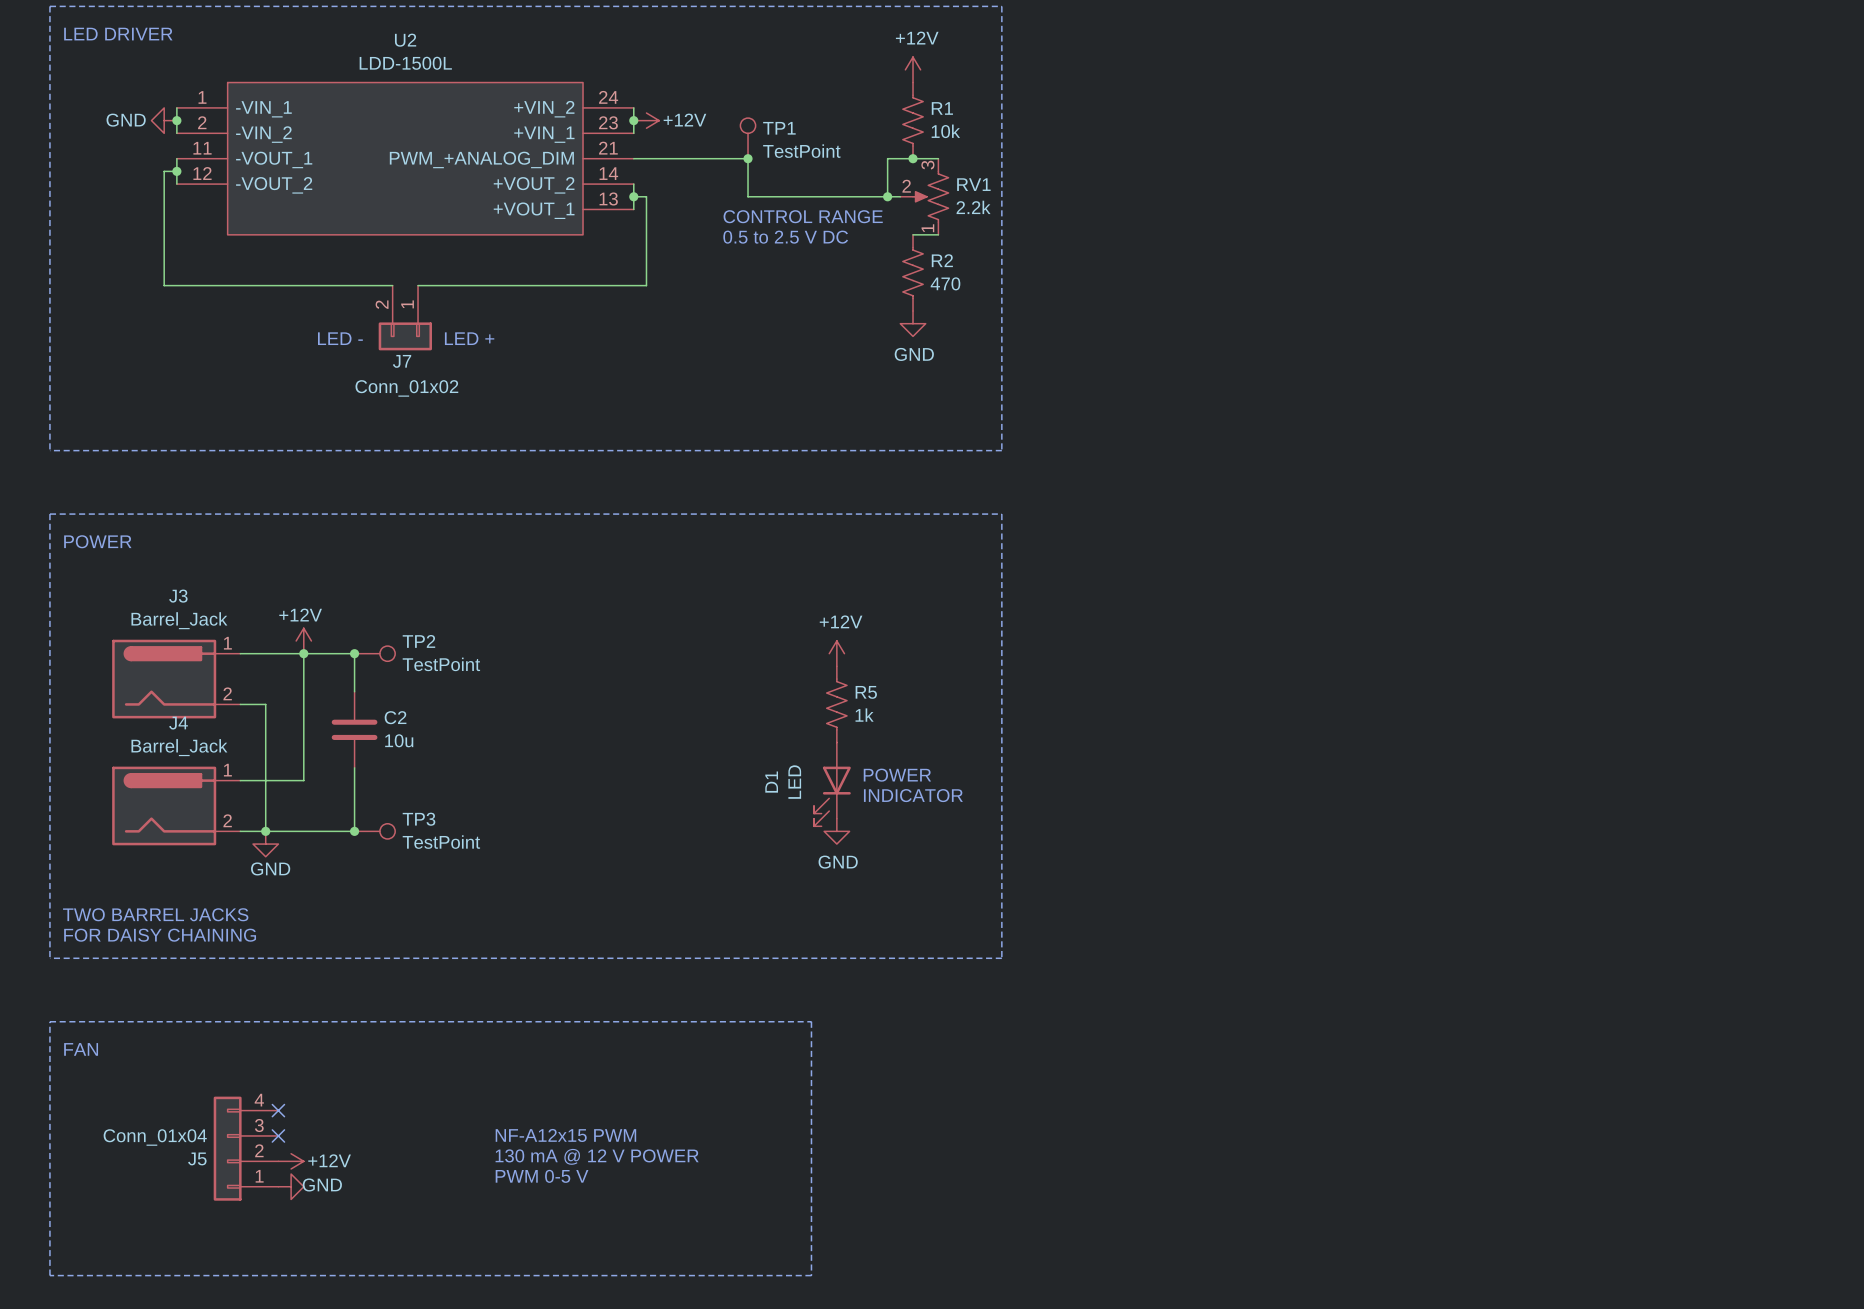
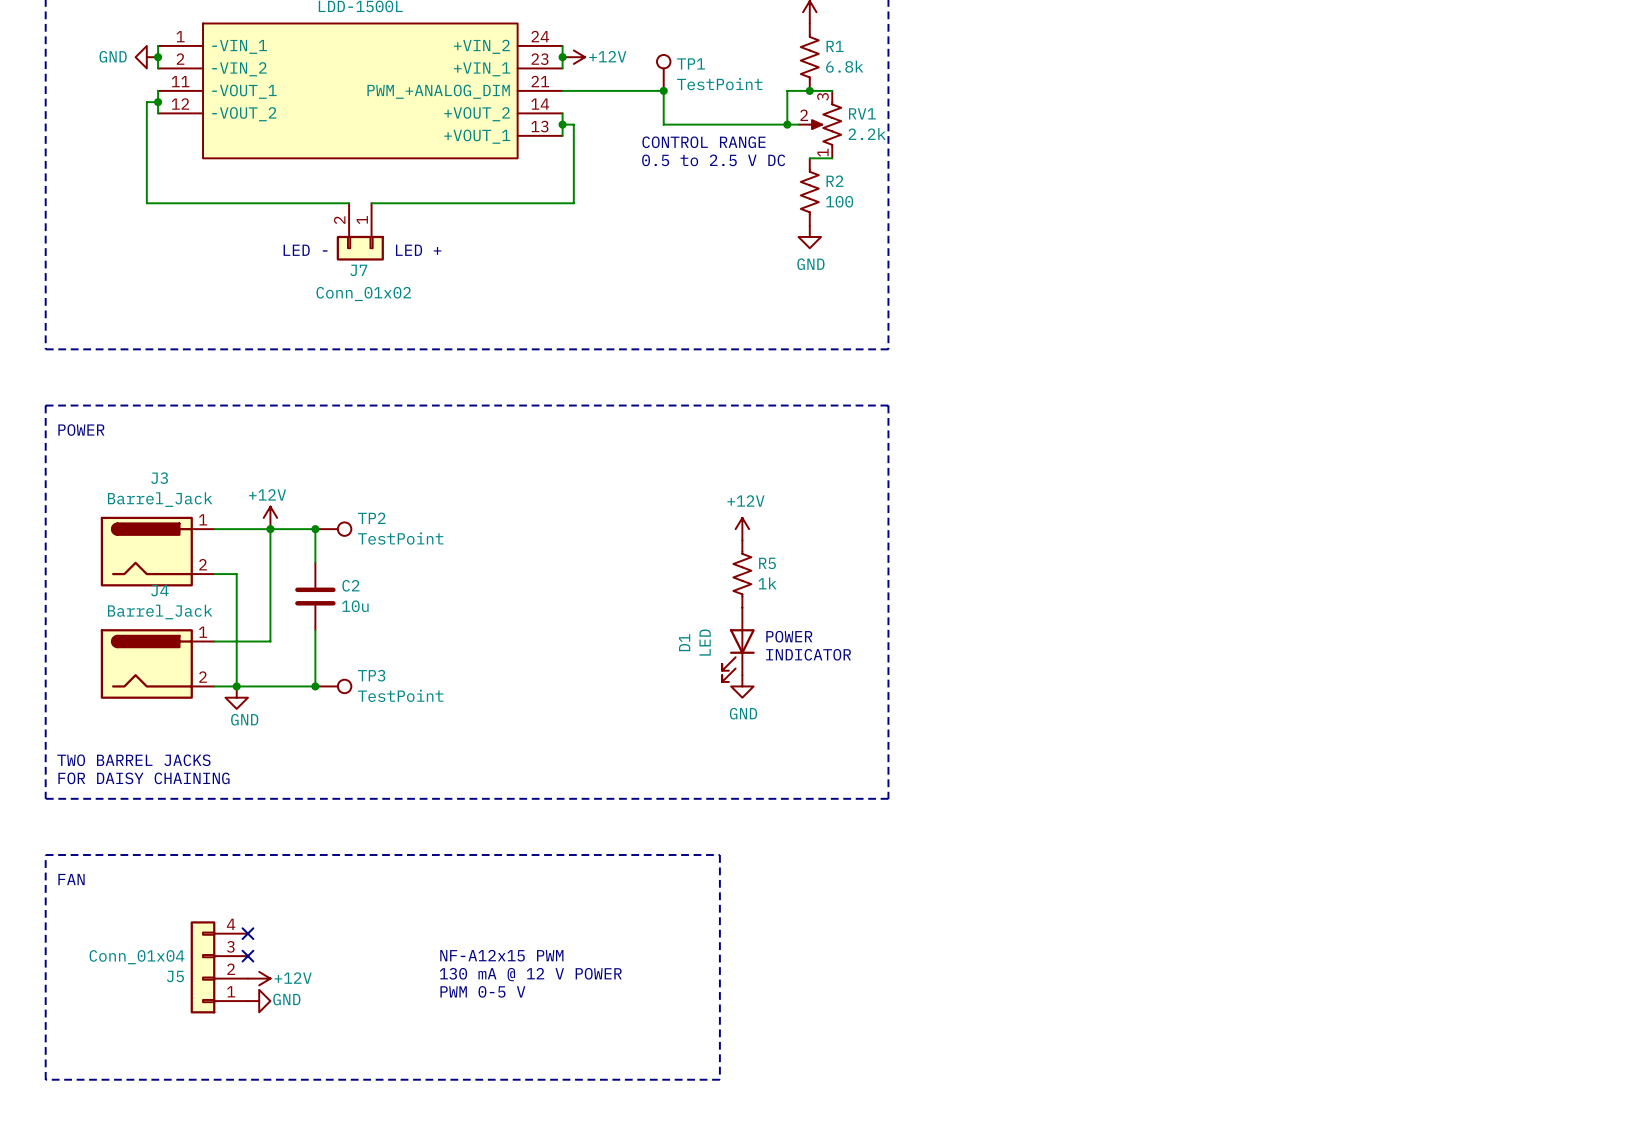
R1 value: 10k (945, 131) -> 6.8k (844, 66)
R2 value: 470 (945, 283) -> 100 (839, 201)

